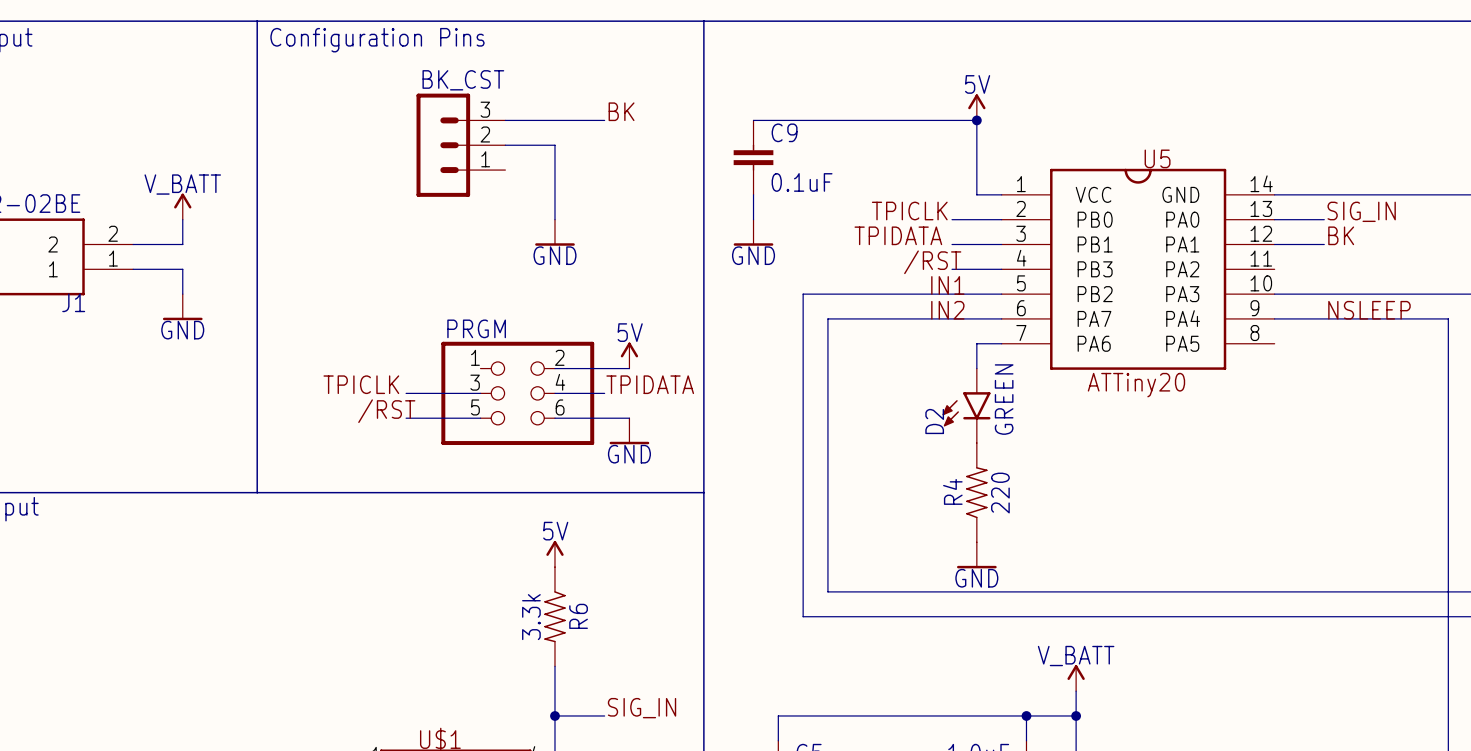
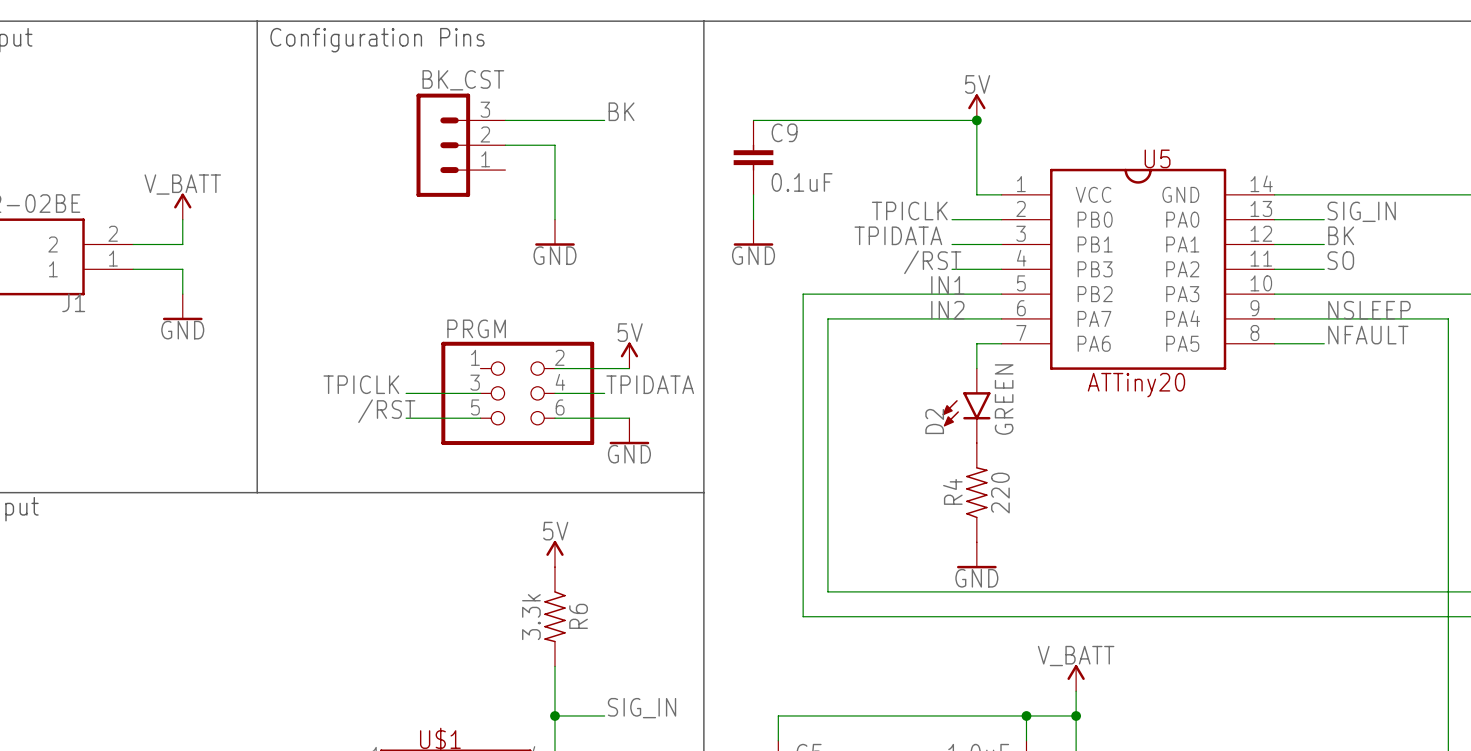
label: none -> SO (1340, 260)
wire: none -> (1274, 269) (1324, 269)
label: none -> NFAULT (1368, 335)
wire: none -> (1274, 343) (1324, 343)

